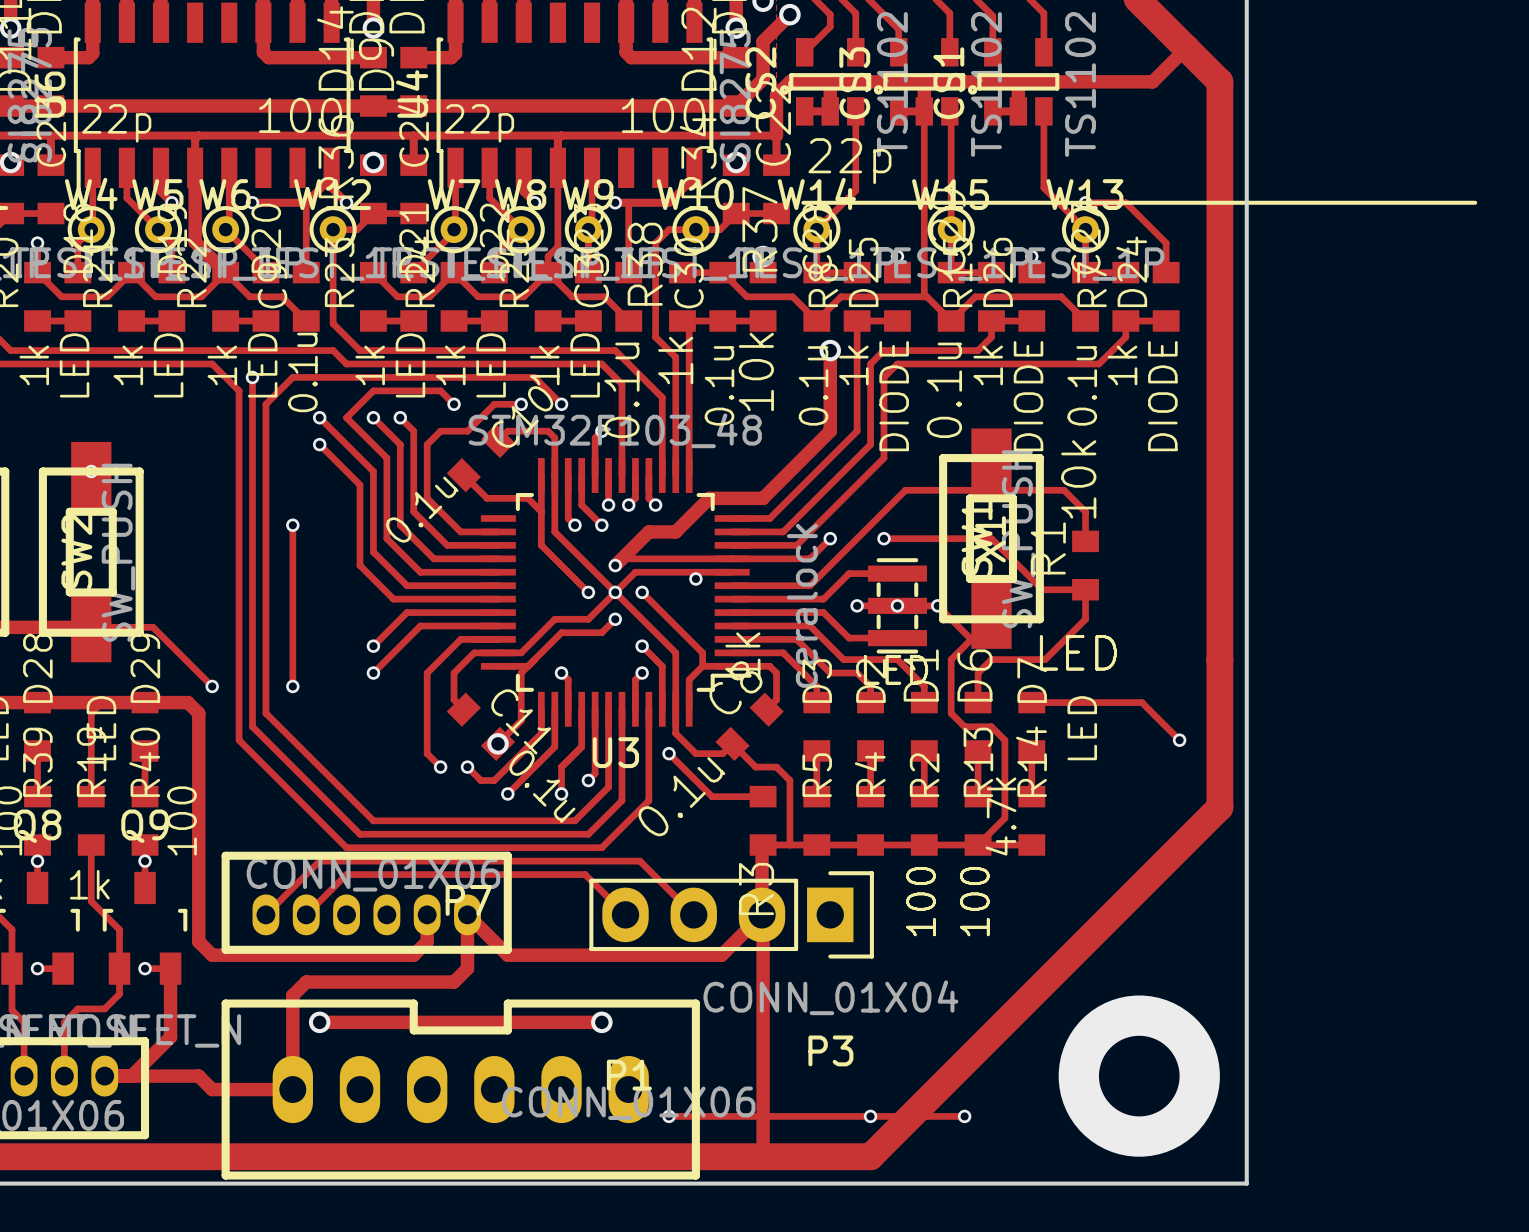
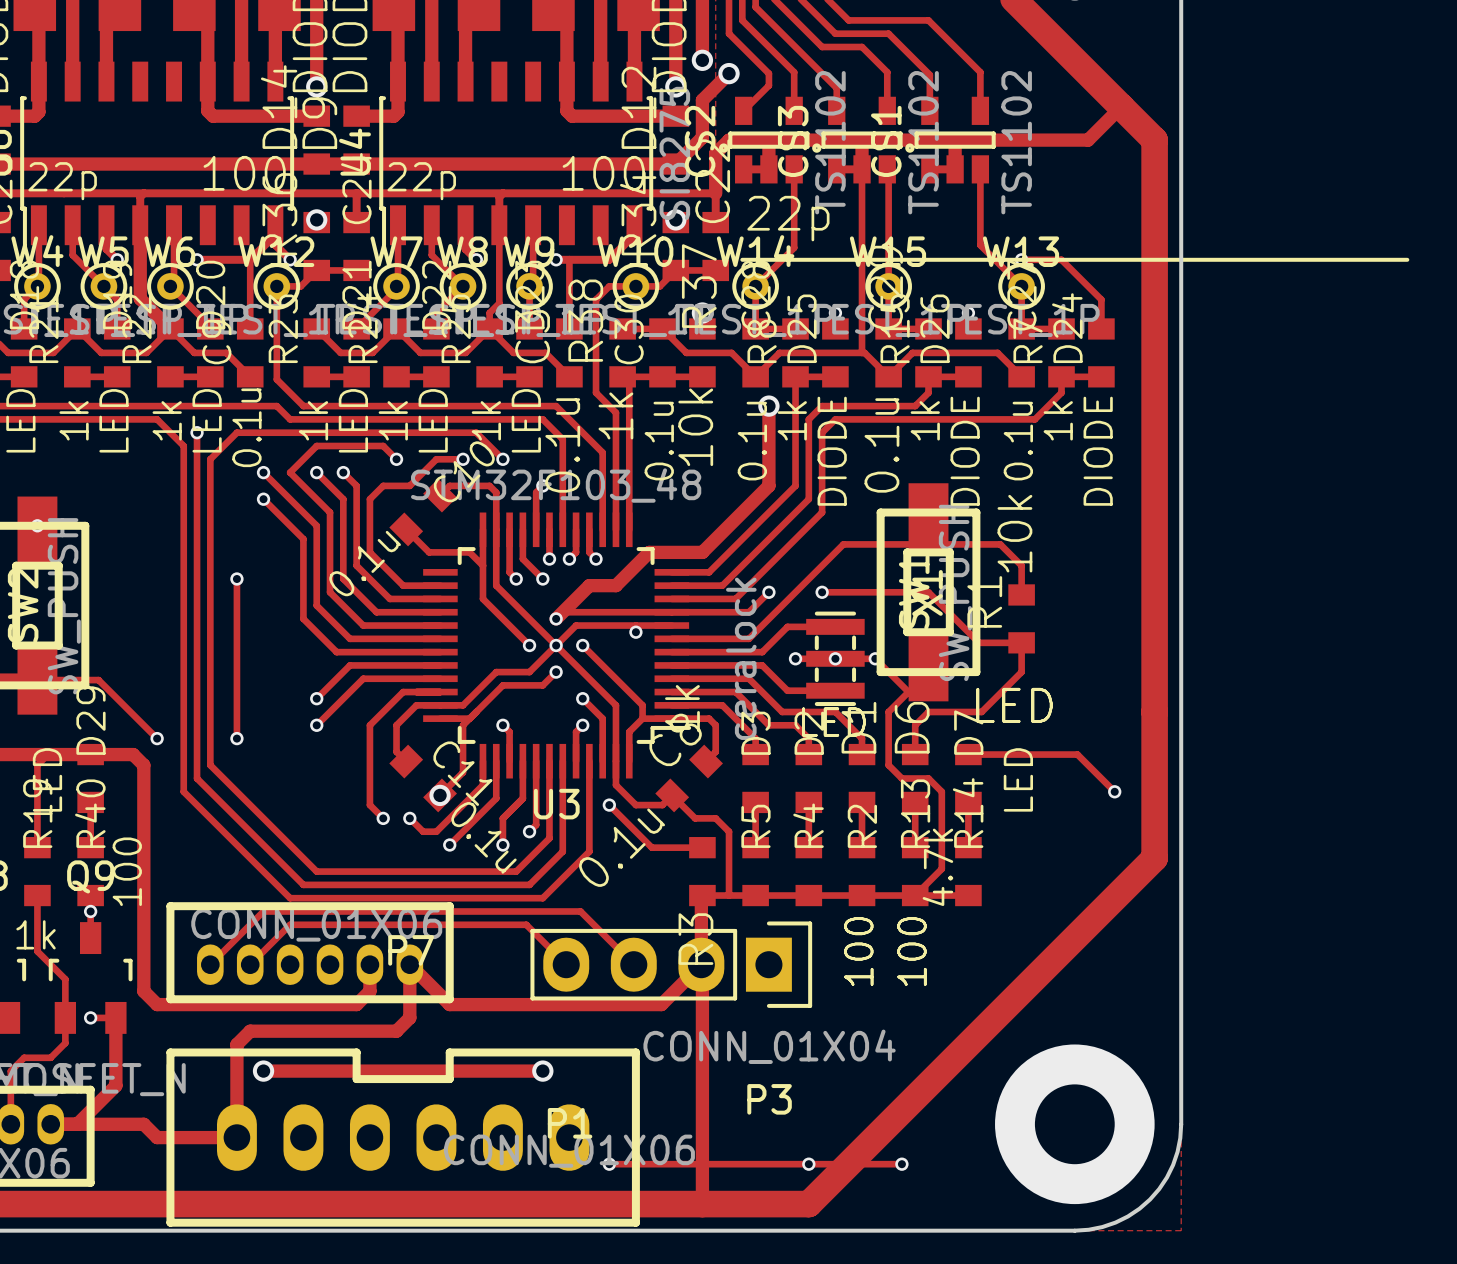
board edge: (1246, 1076) (1246, 1183) (1139, 1183) -> (1181, 1124) (1177, 1151) (1173, 1165) (1159, 1189) (1150, 1199) (1139, 1208) (1115, 1222) (1102, 1227) (1074, 1230)

